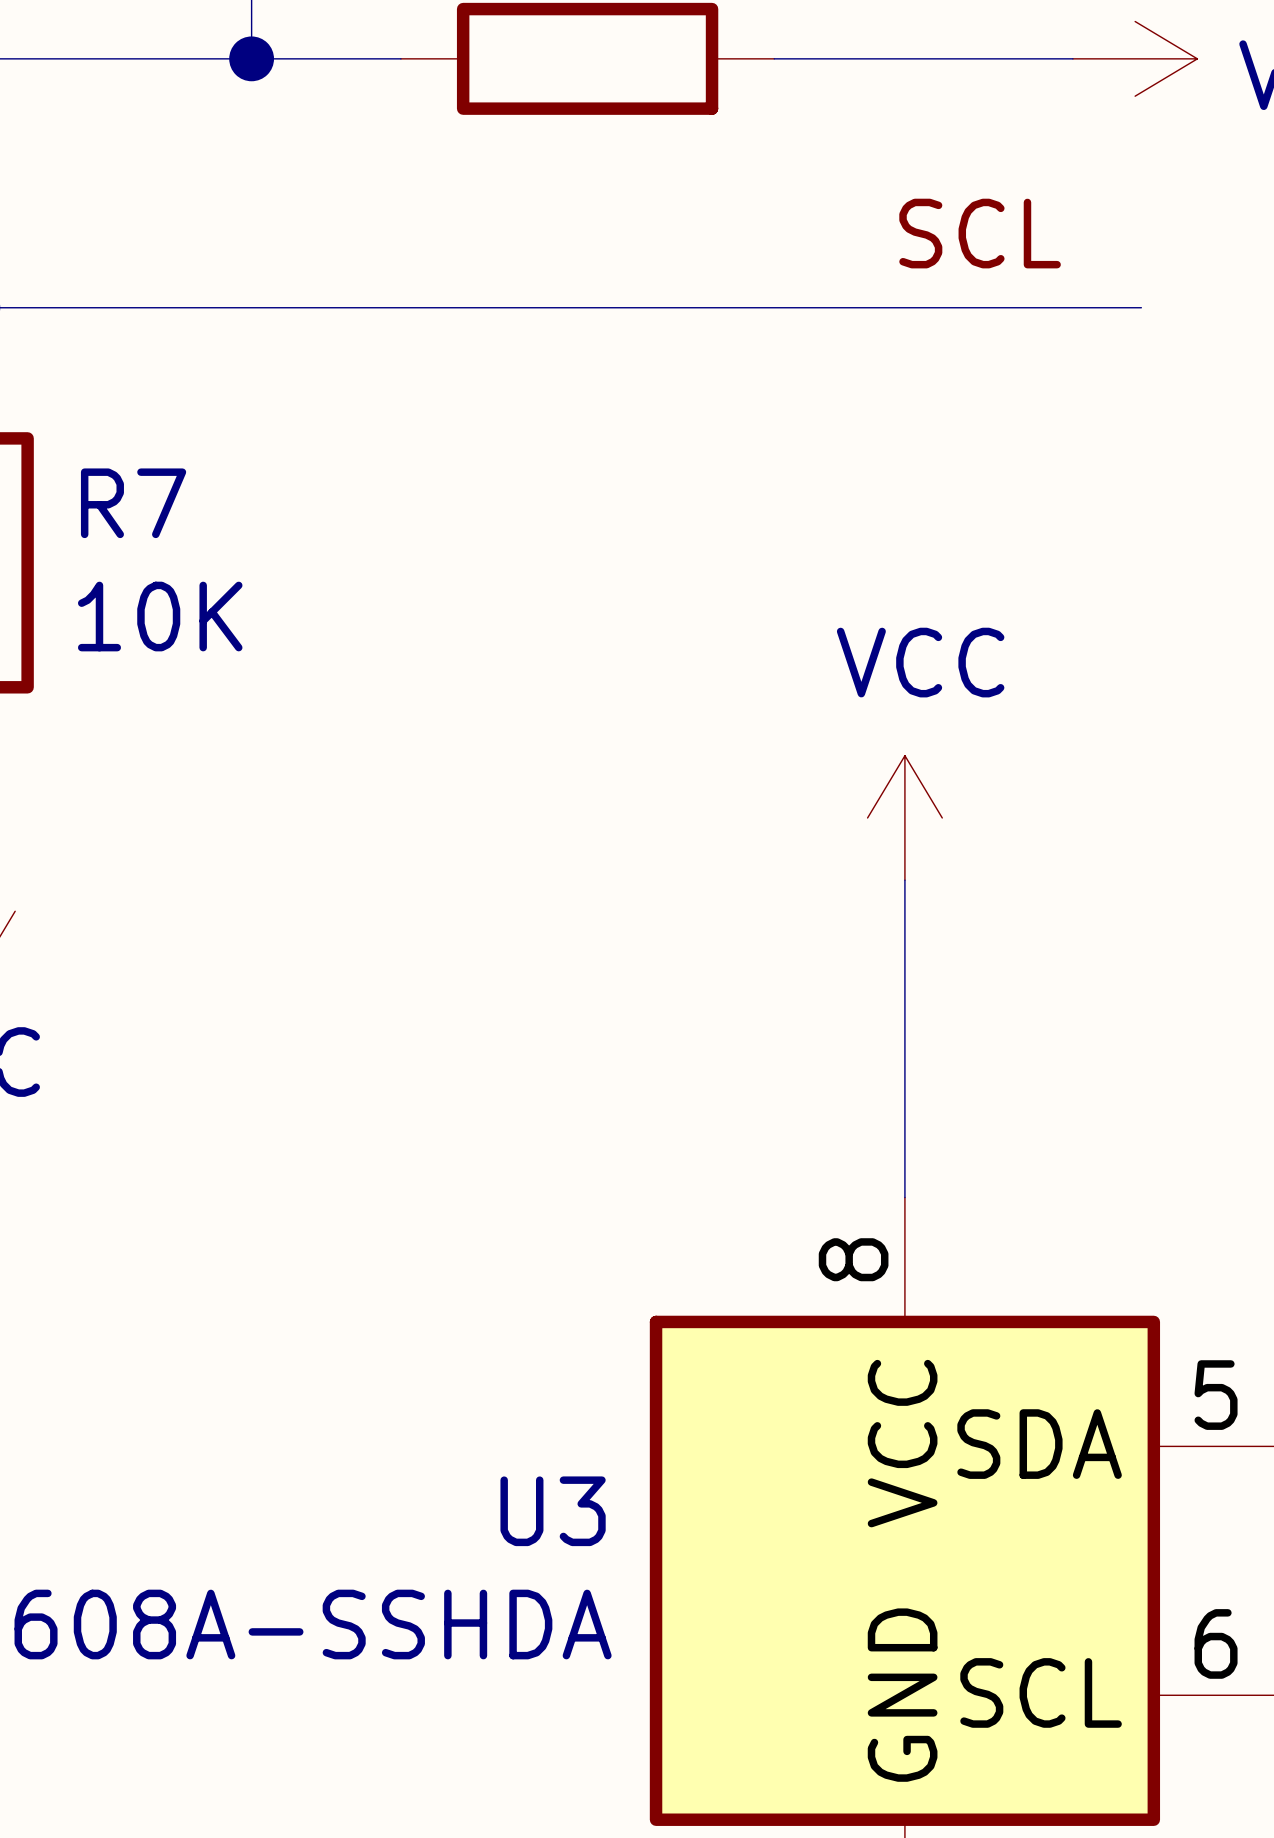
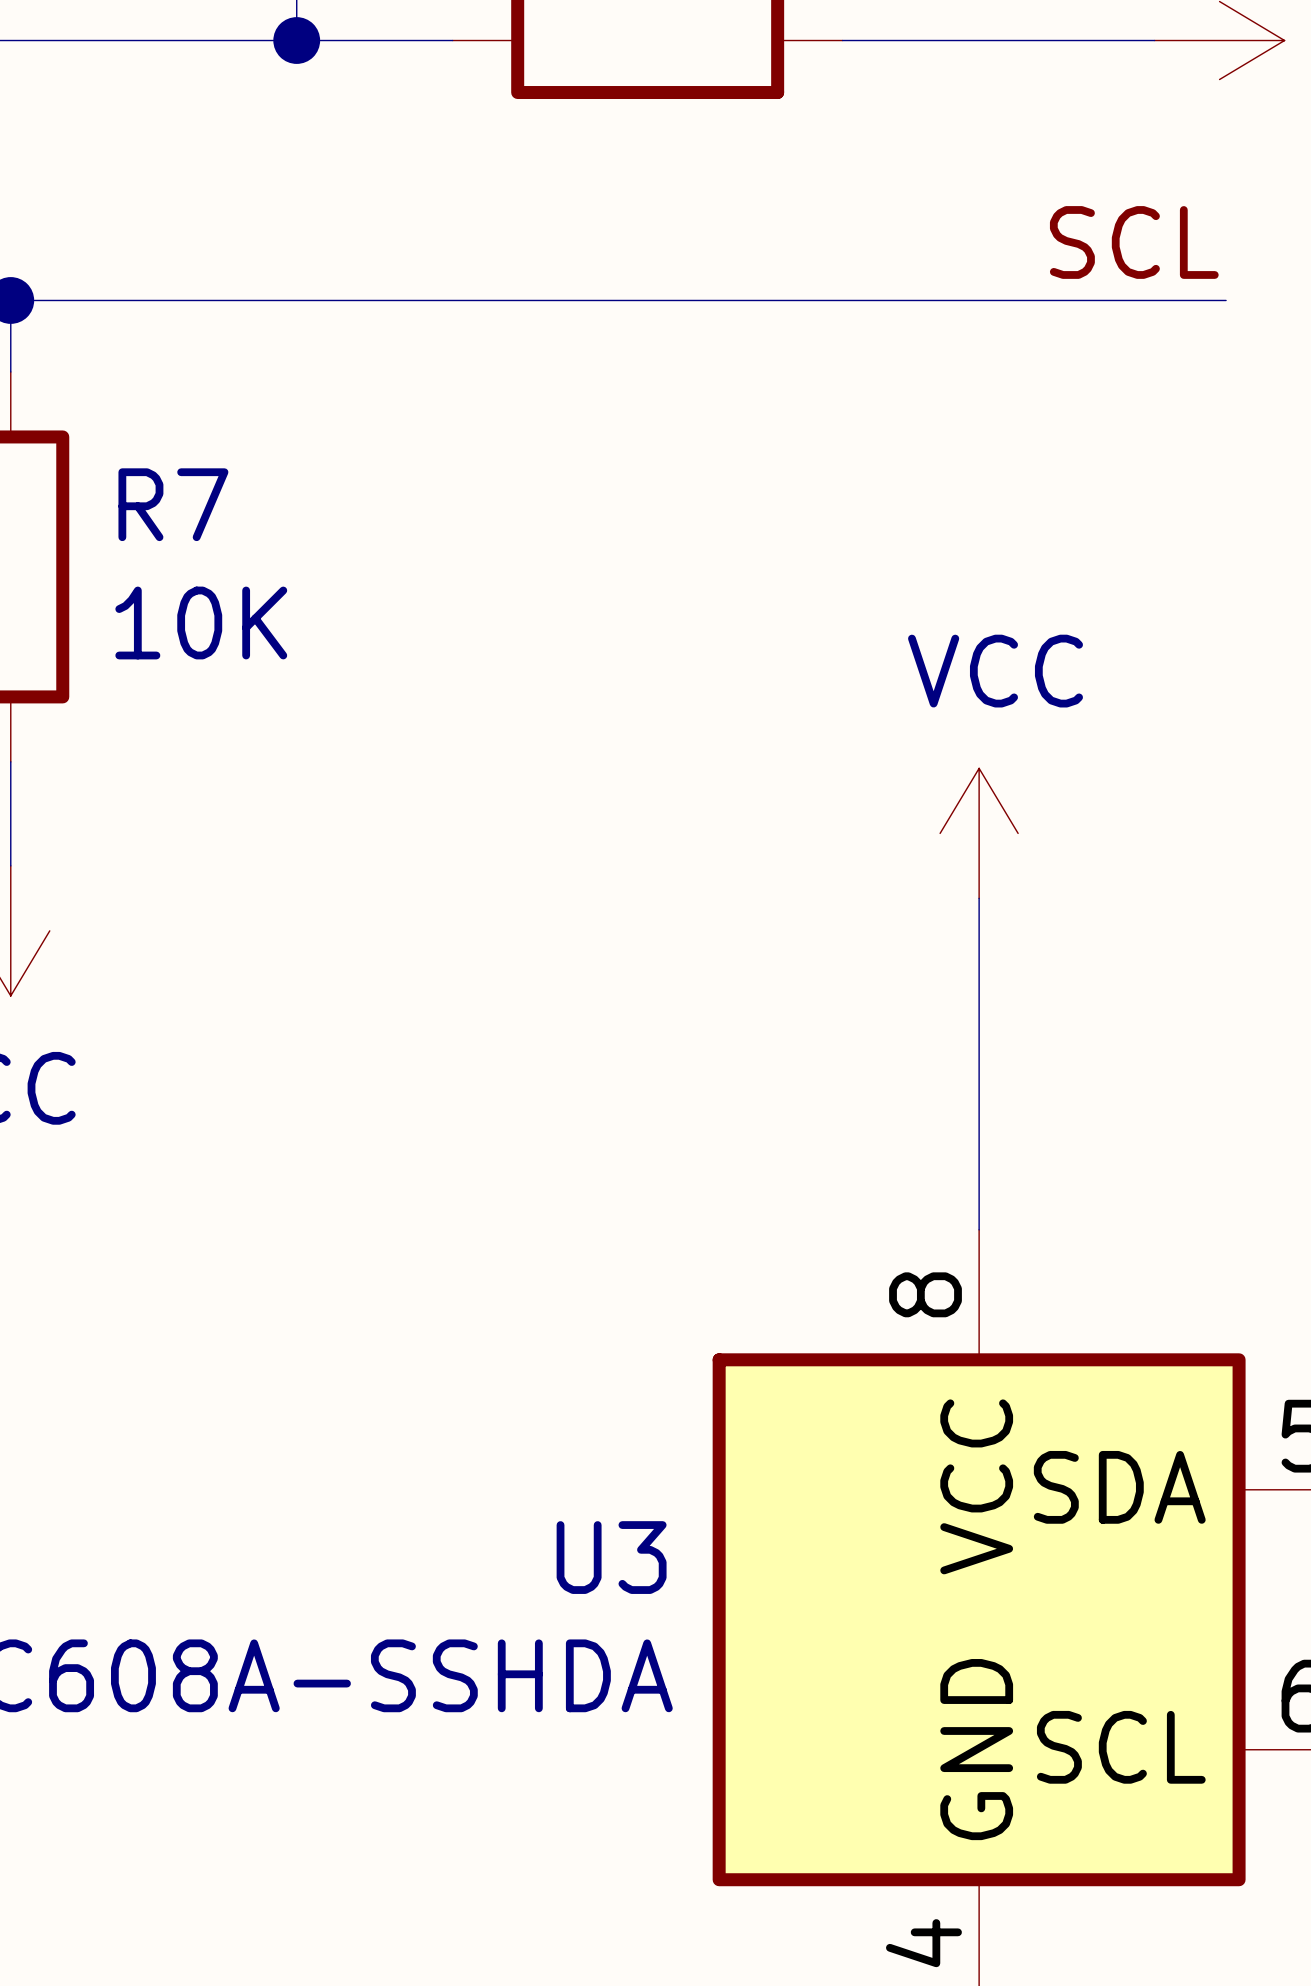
label position: SCL (980, 233) -> SCL (1134, 242)

